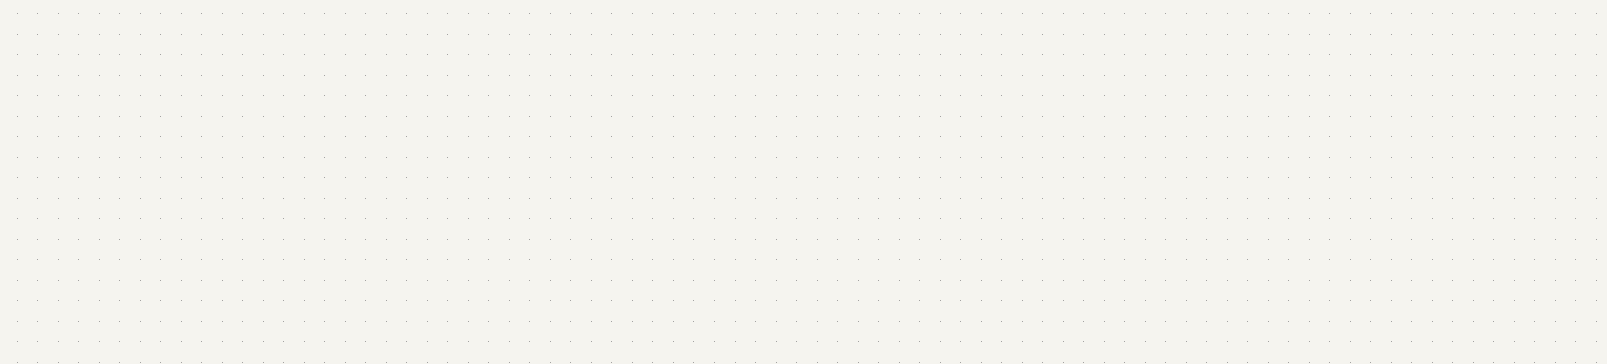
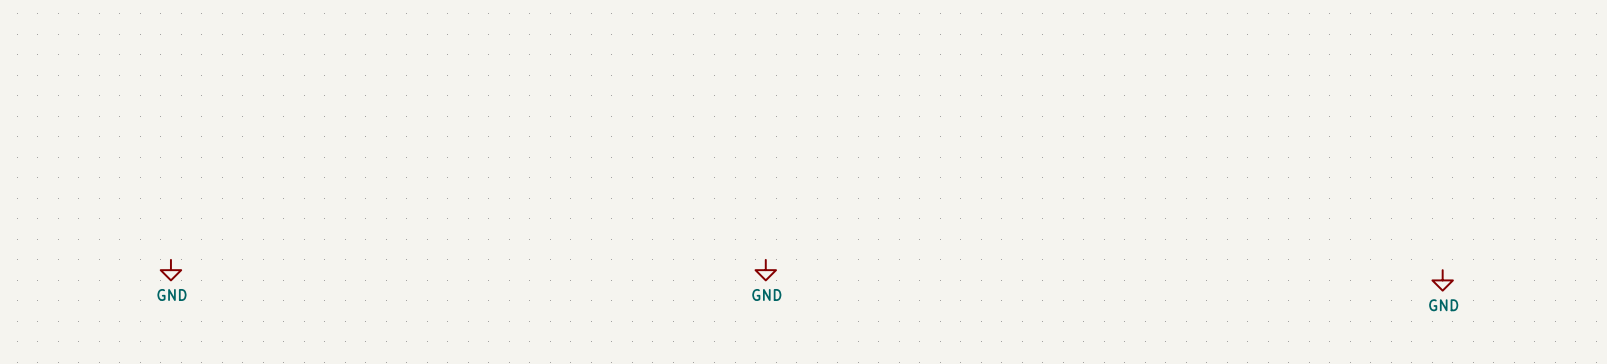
power symbol: none -> GND (170, 270)
power symbol: none -> GND (765, 270)
power symbol: none -> GND (1442, 280)

